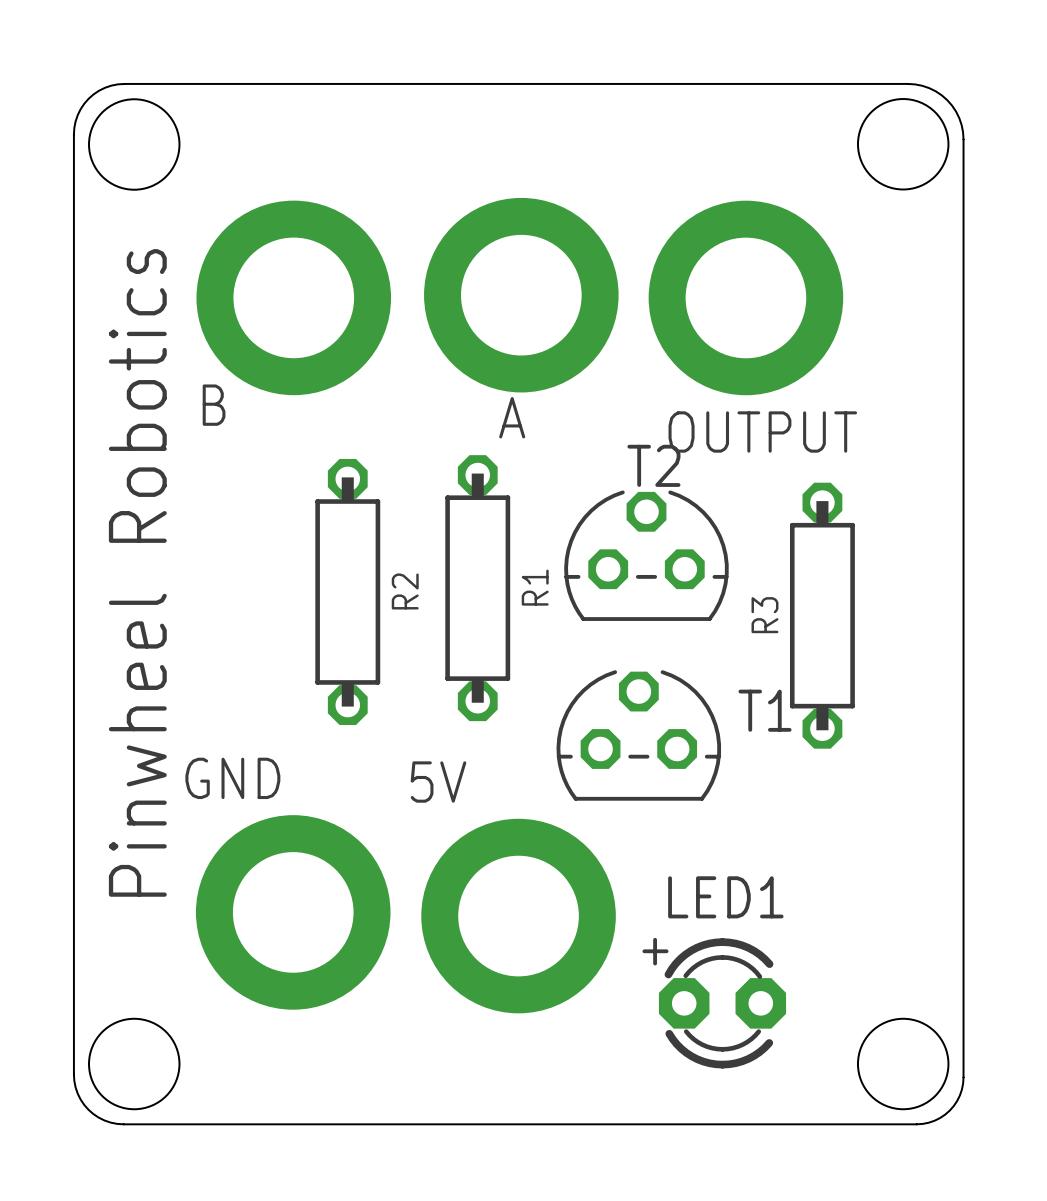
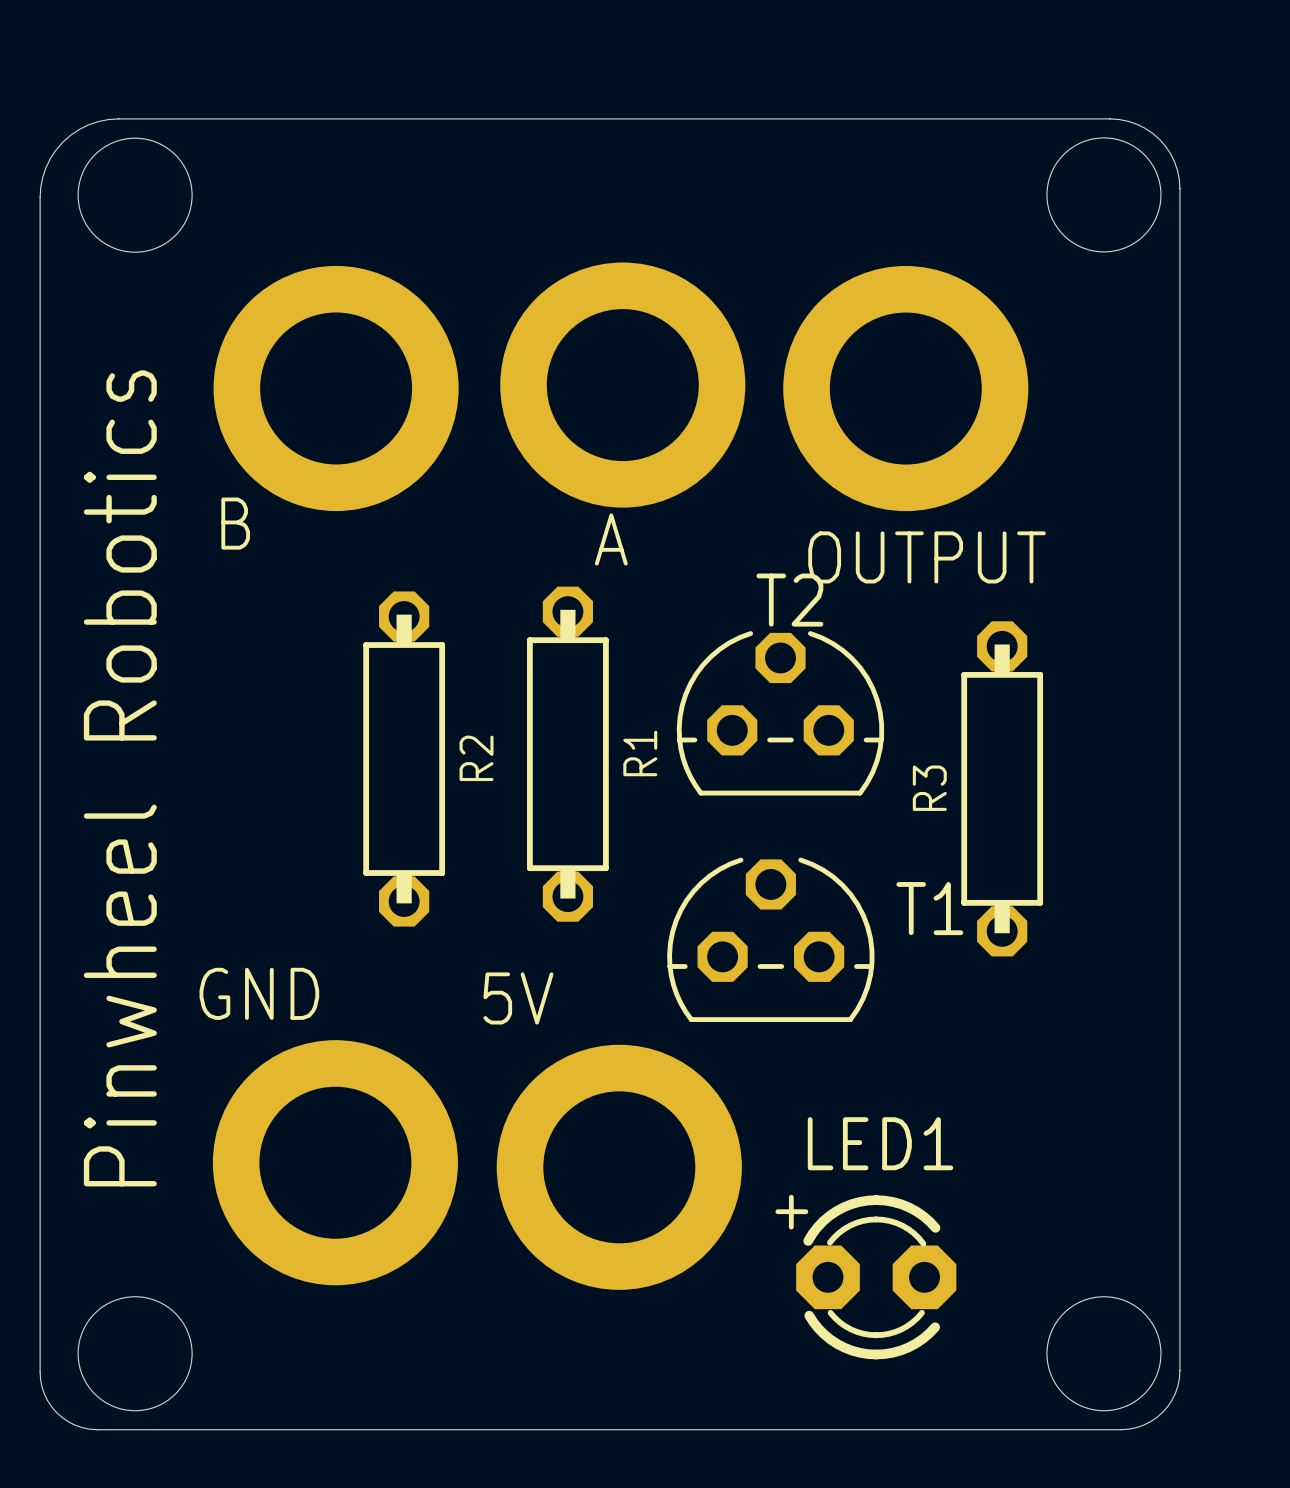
board edge: (124, 83) (105, 87) (88, 98) (77, 115) (73, 134) (73, 1074) (77, 1093) (88, 1109) (104, 1120) (123, 1124) -> (122, 118) (108, 119) (88, 124) (63, 141) (46, 167) (40, 197) (40, 1379) (44, 1394) (51, 1407) (68, 1422) (90, 1429) (121, 1429)
text position: Pinwheel Robotics (137, 572) -> Pinwheel Robotics (120, 778)

